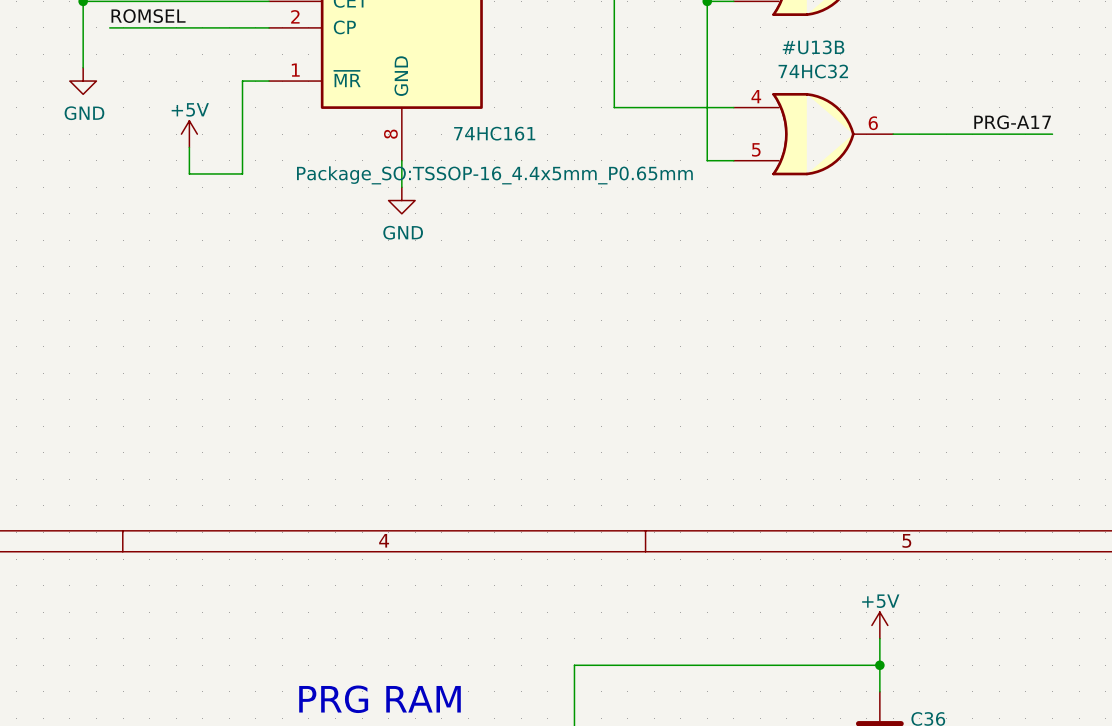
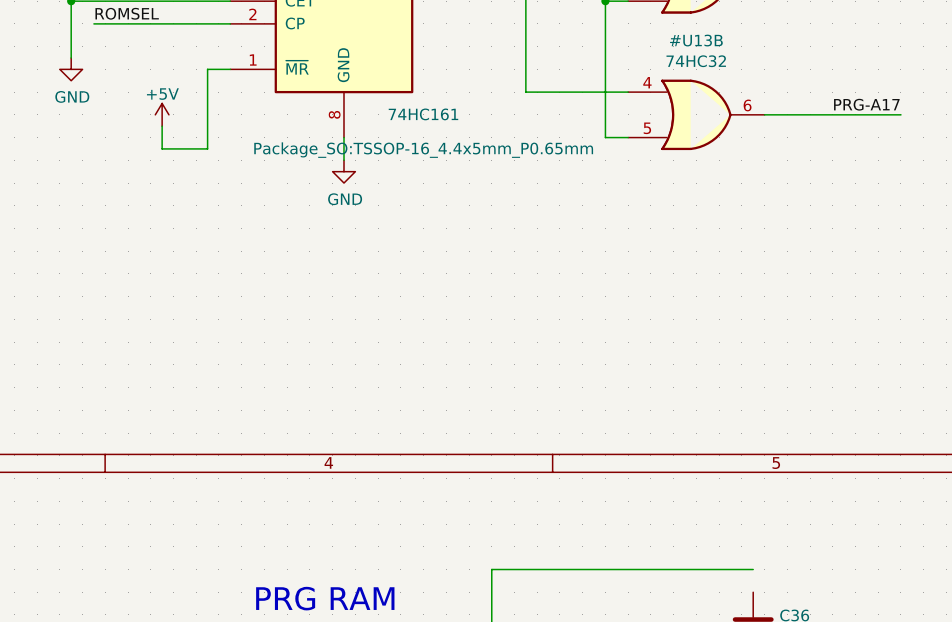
power symbol: +5V (879, 625) -> none
wire: (879, 638) (879, 691) -> none
junction: (879, 665) -> none

